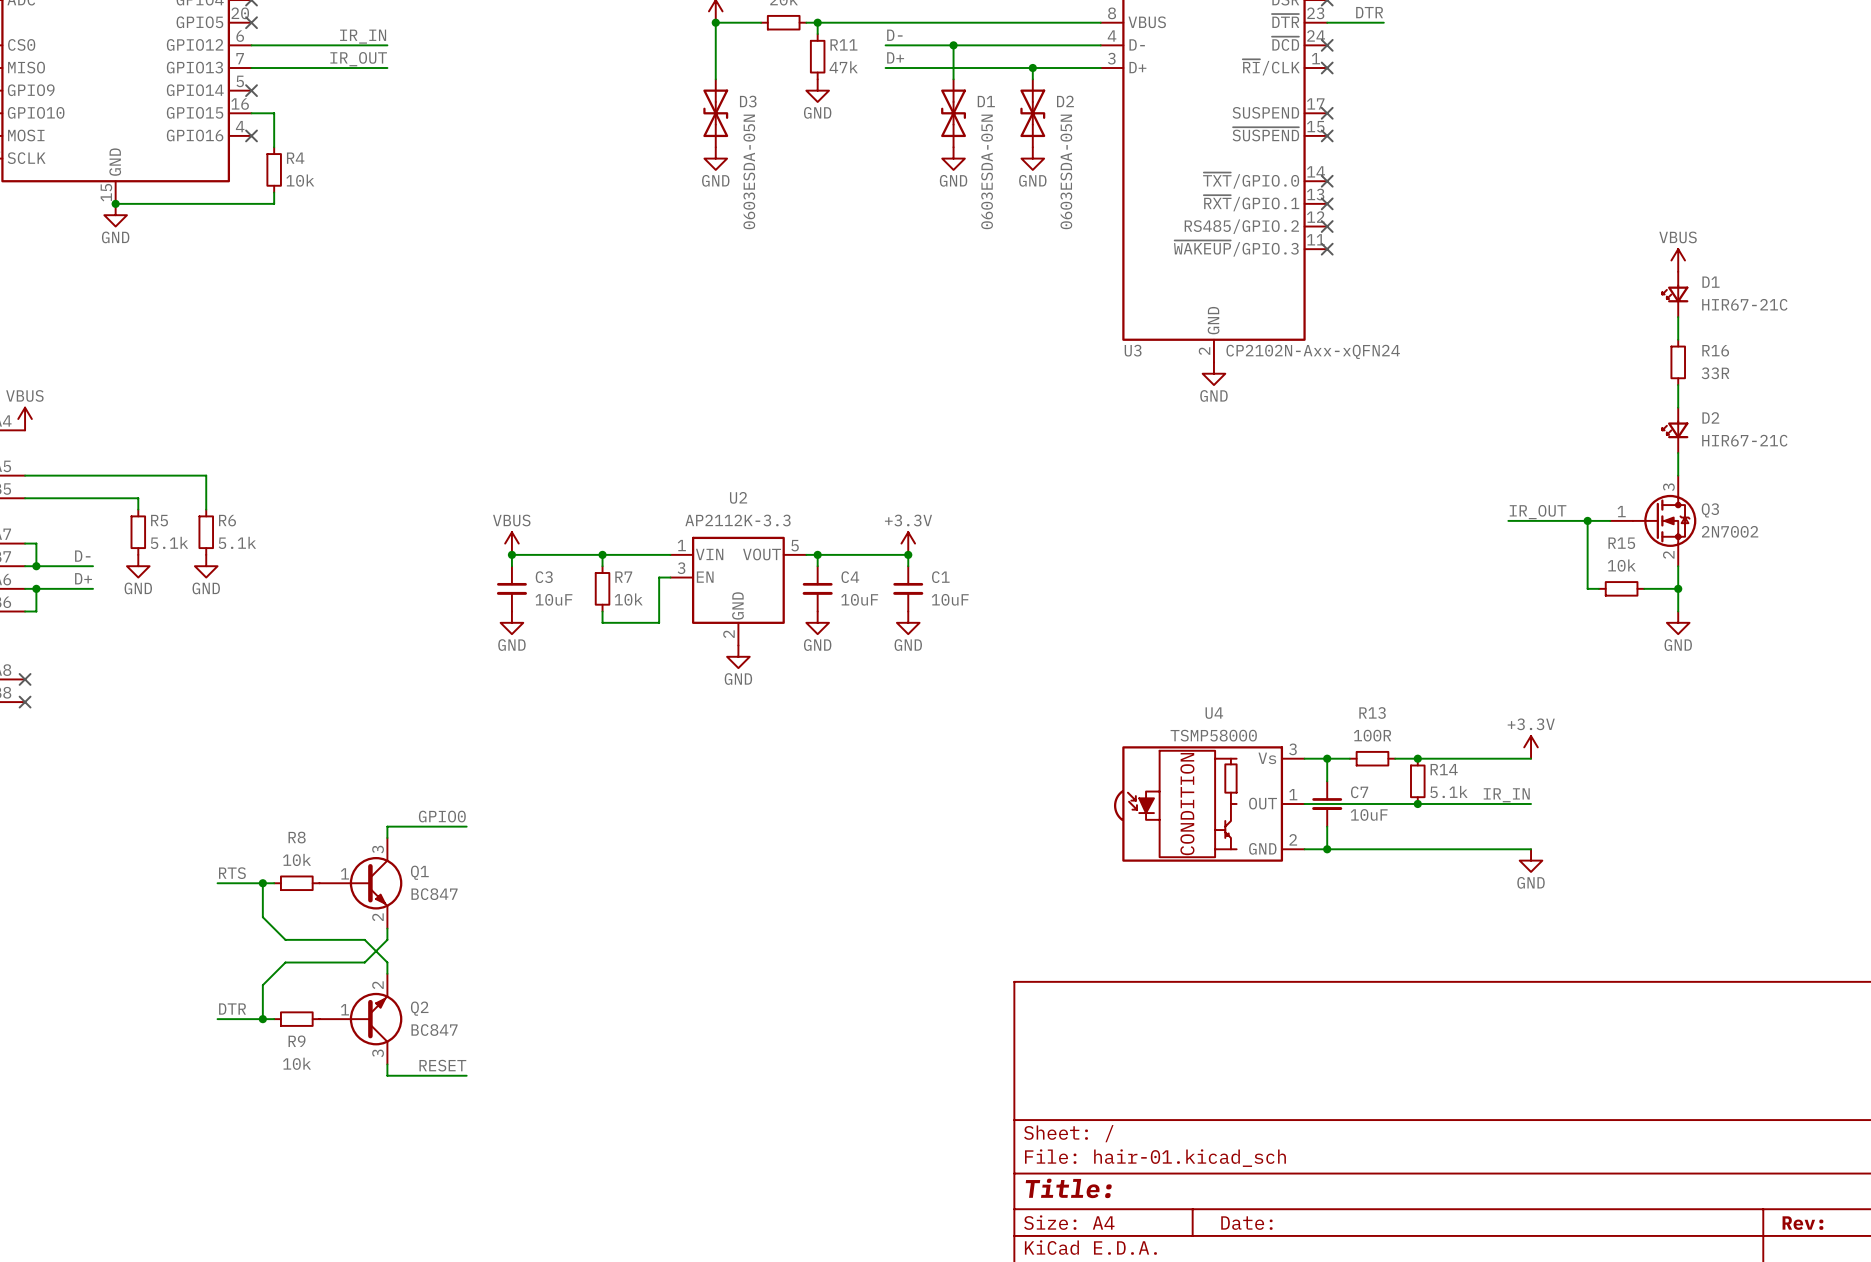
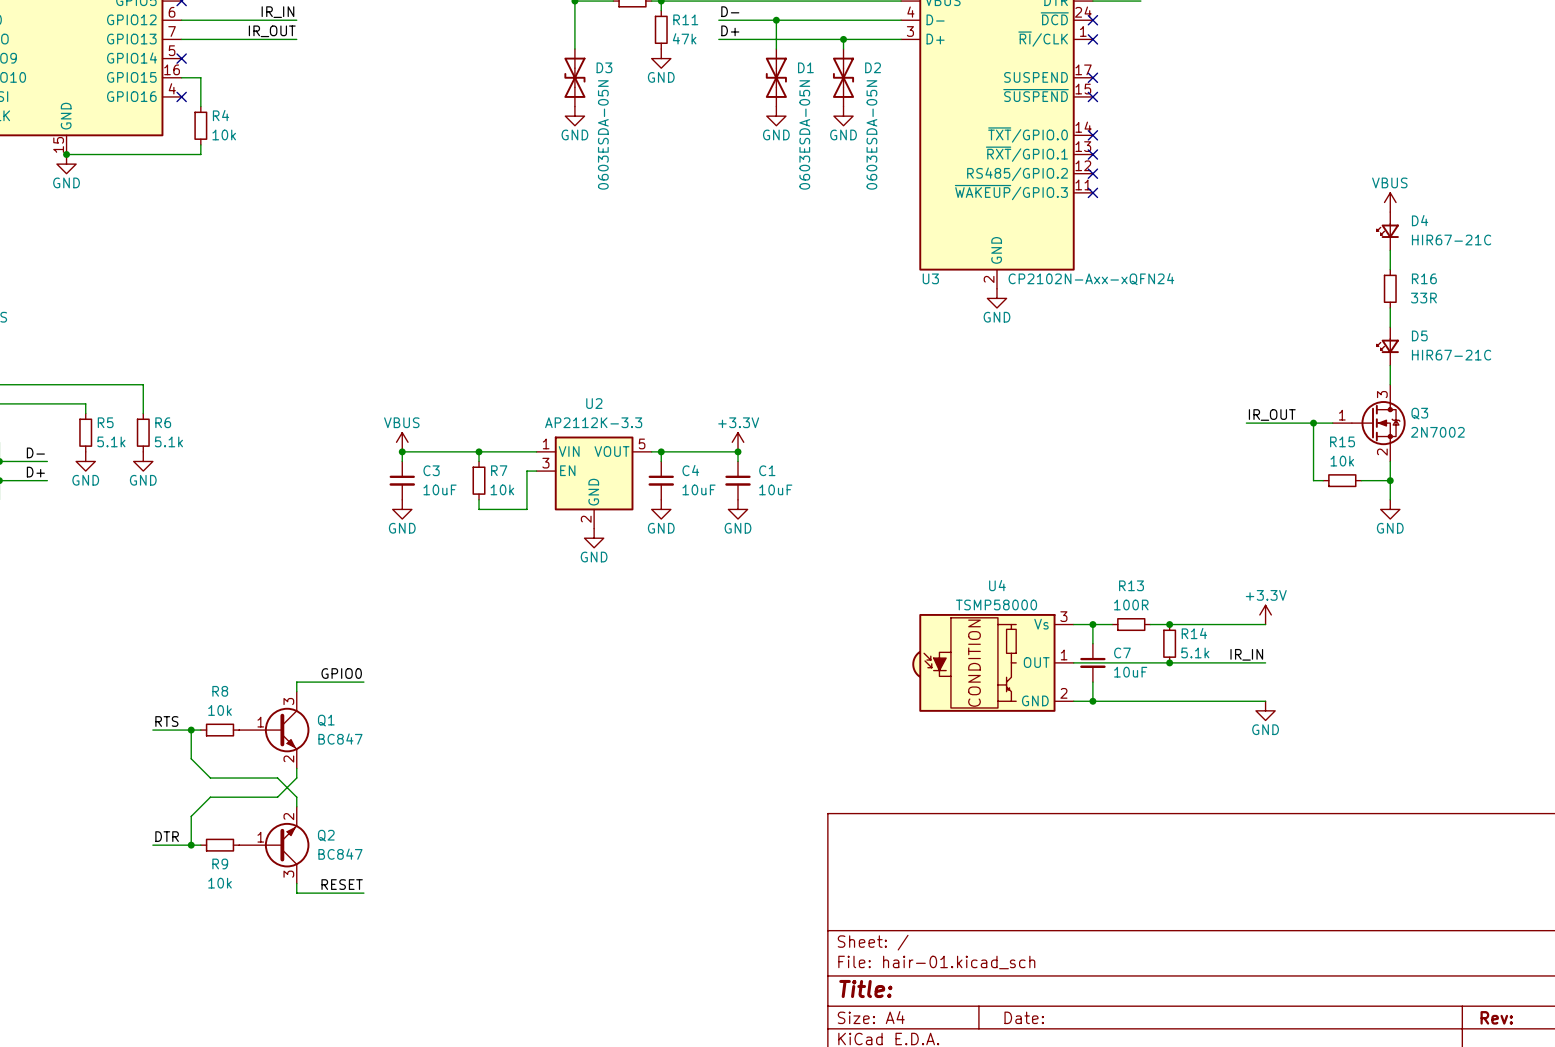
D1 name: D1 (1710, 282) -> D4 (1420, 220)
D2 name: D2 (1710, 417) -> D5 (1419, 335)

